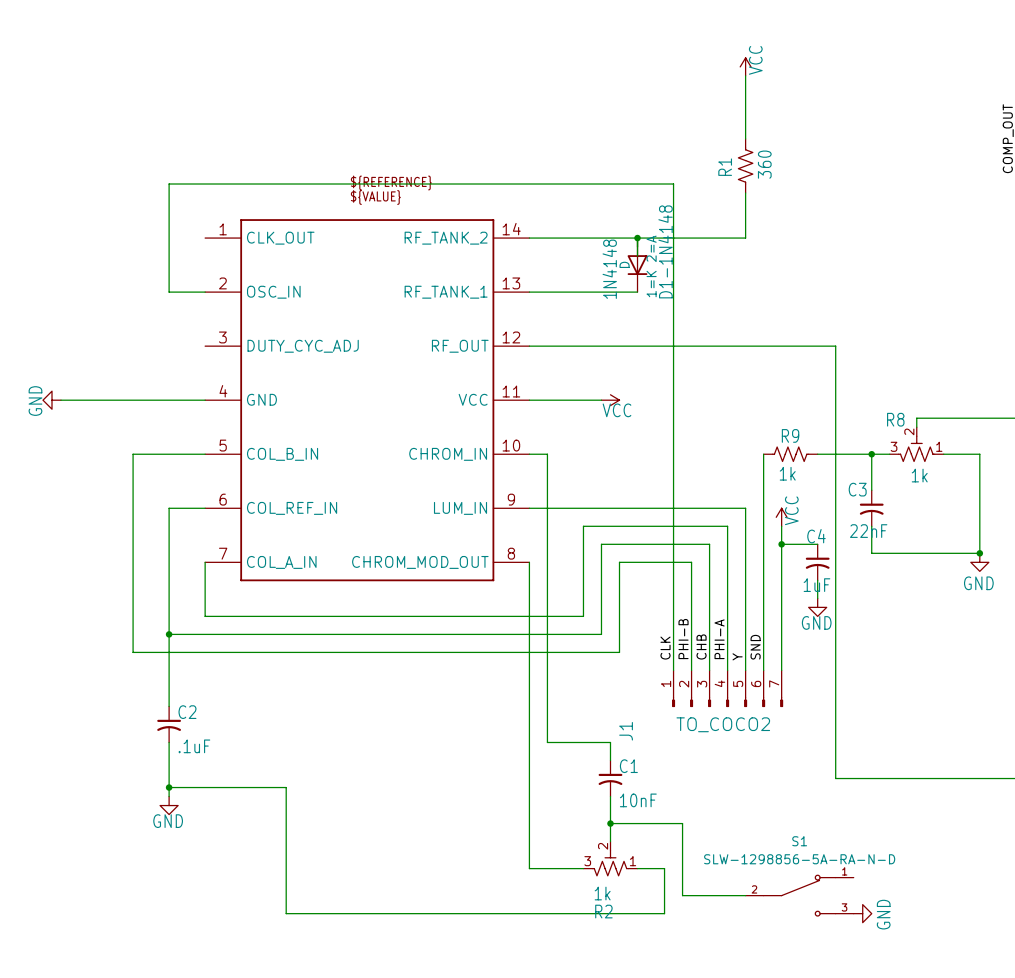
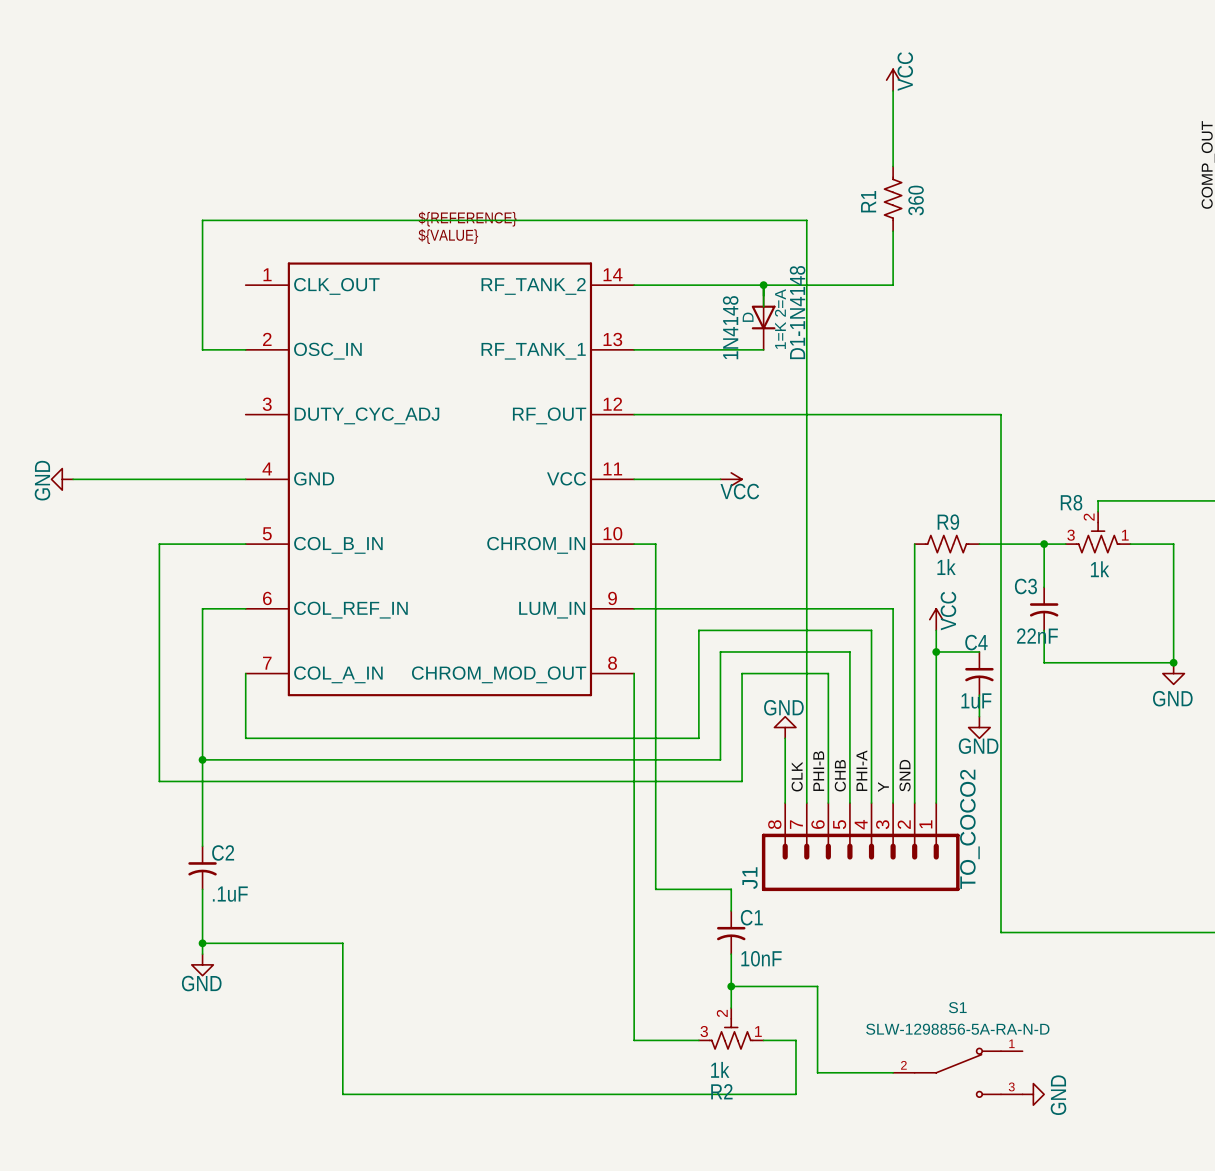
power symbol: none -> GND (785, 727)
wire: none -> (785, 738) (785, 803)
J1 symbol: [672, 670, 784, 708] -> [761, 803, 960, 892]
J1 value position: TO_COCO2 (723, 724) -> TO_COCO2 (969, 829)

